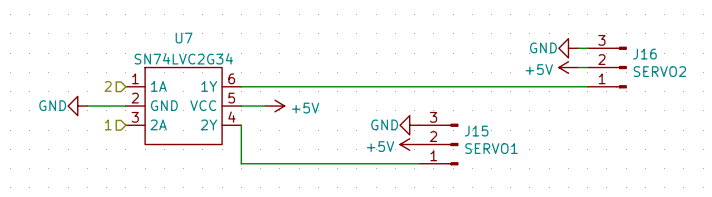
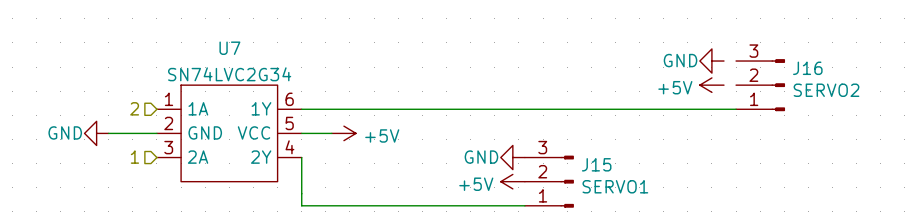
wire: (578, 48) (587, 48) -> none
wire: (578, 67) (587, 67) -> none

